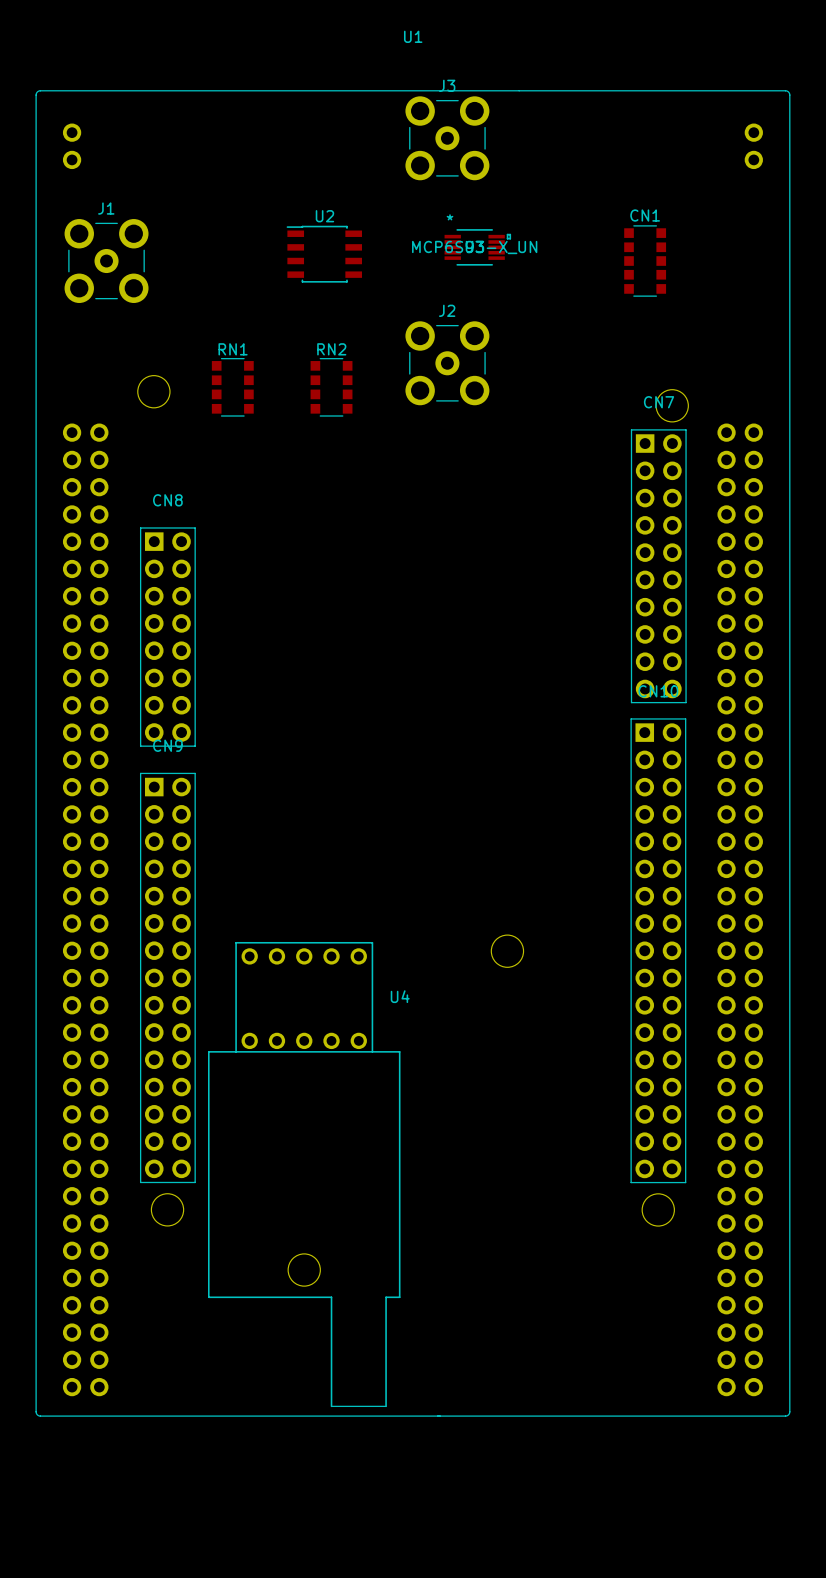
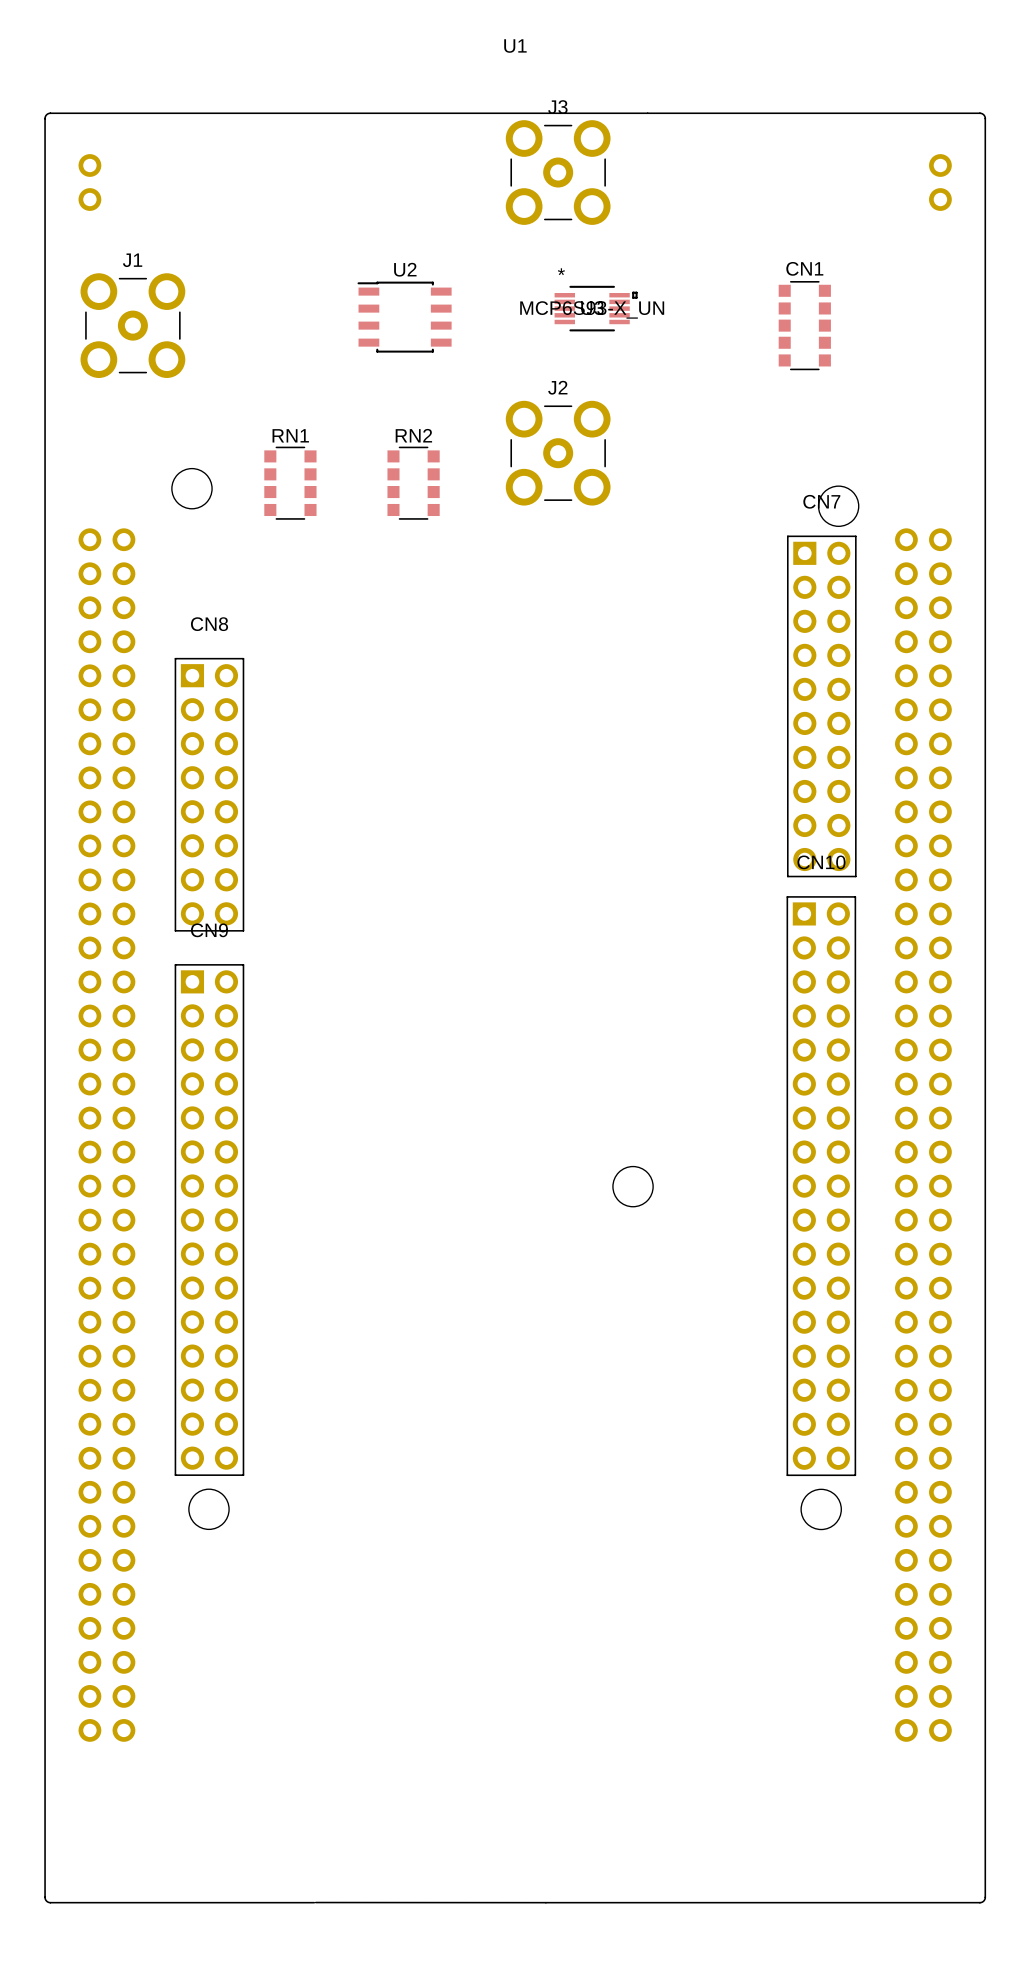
U1 footprint: [35, 90, 791, 1417] -> [44, 112, 987, 1904]
U4: (304, 1174) -> none

